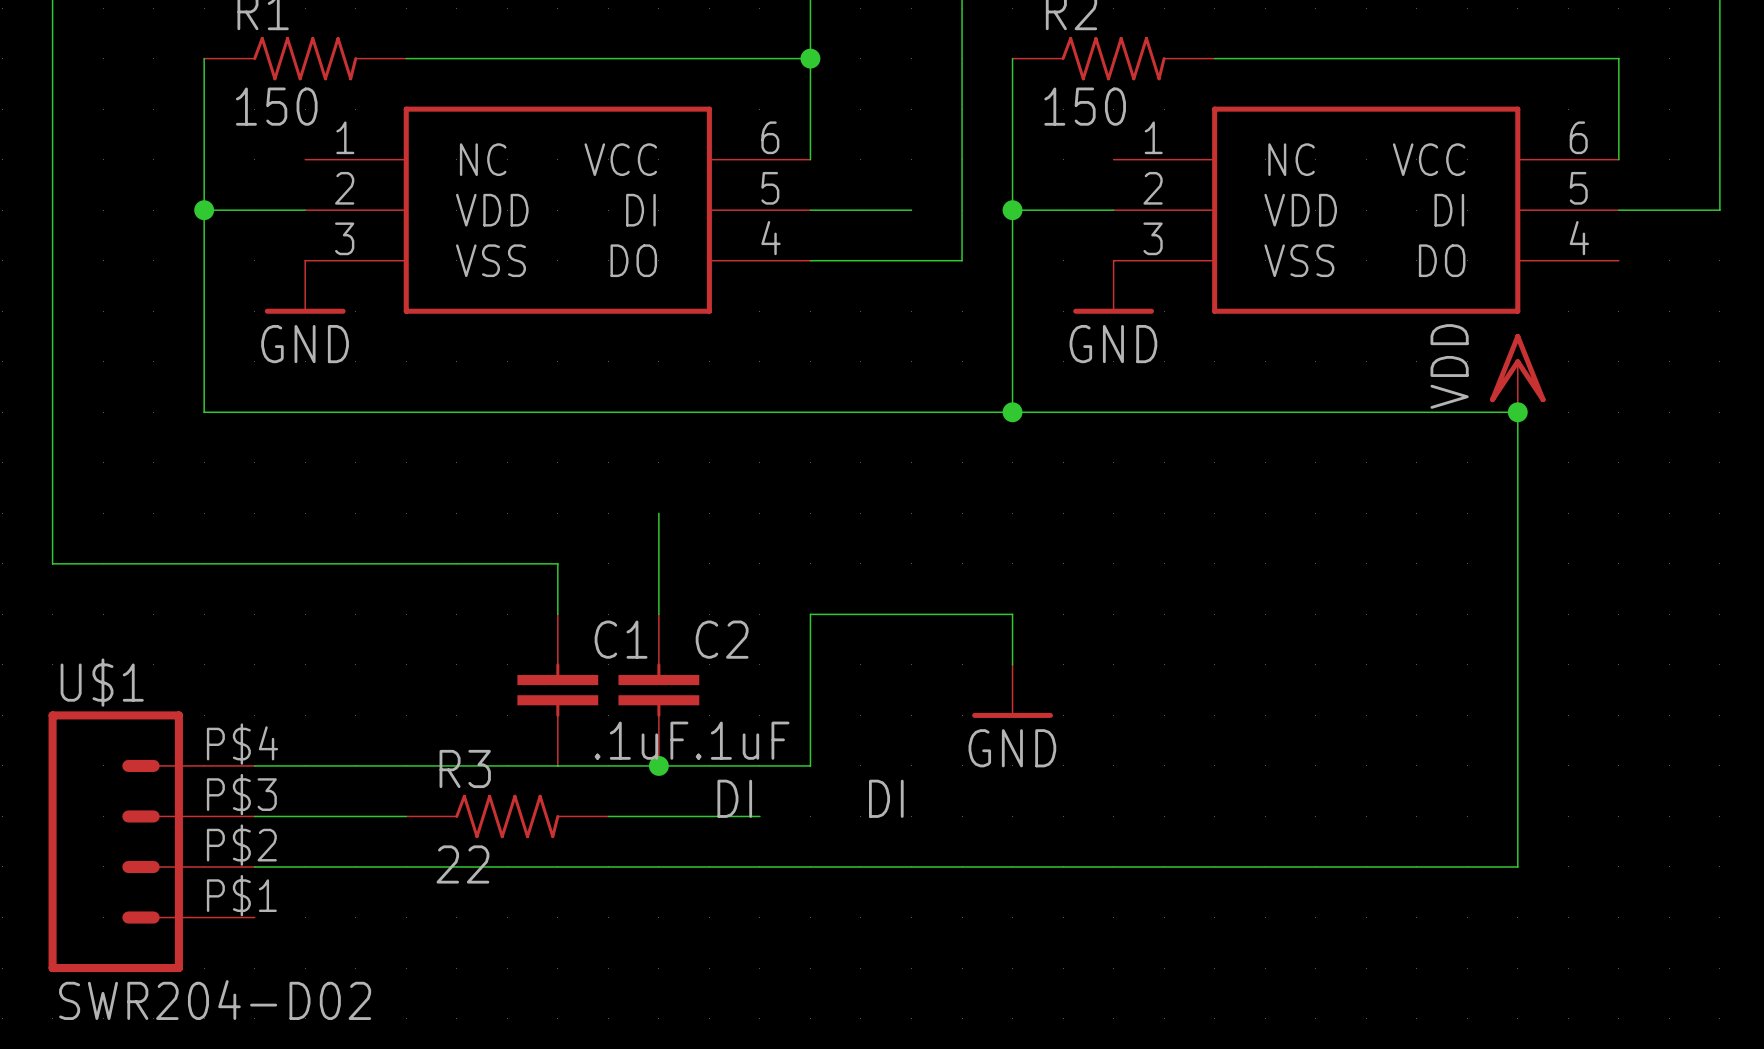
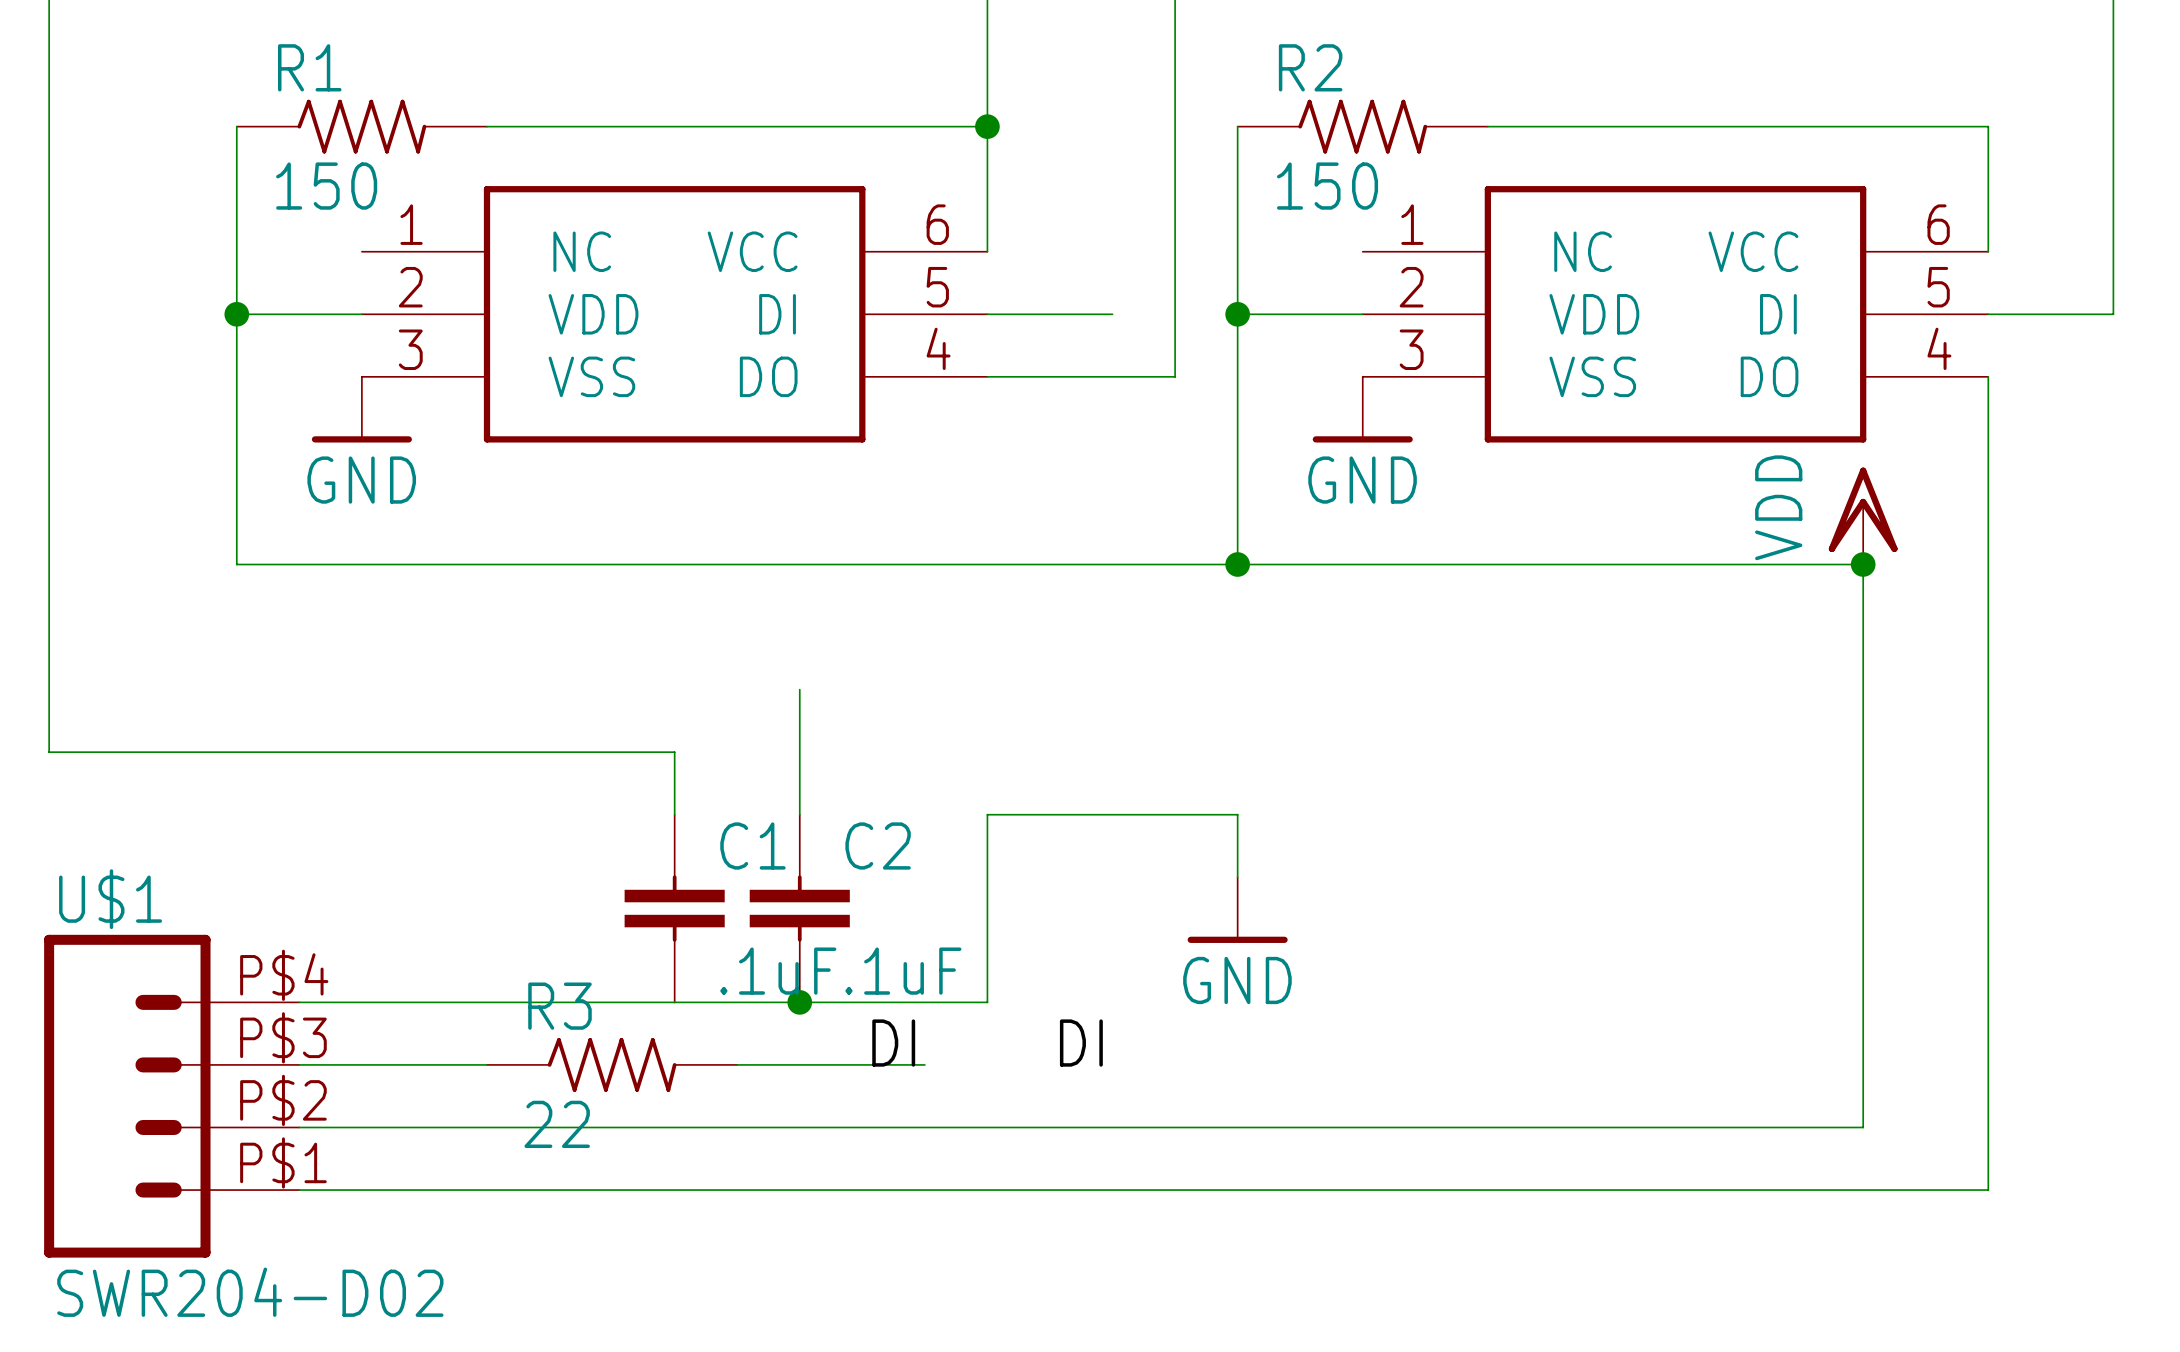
wire: none -> (1988, 376) (1988, 1190) (299, 1190)

